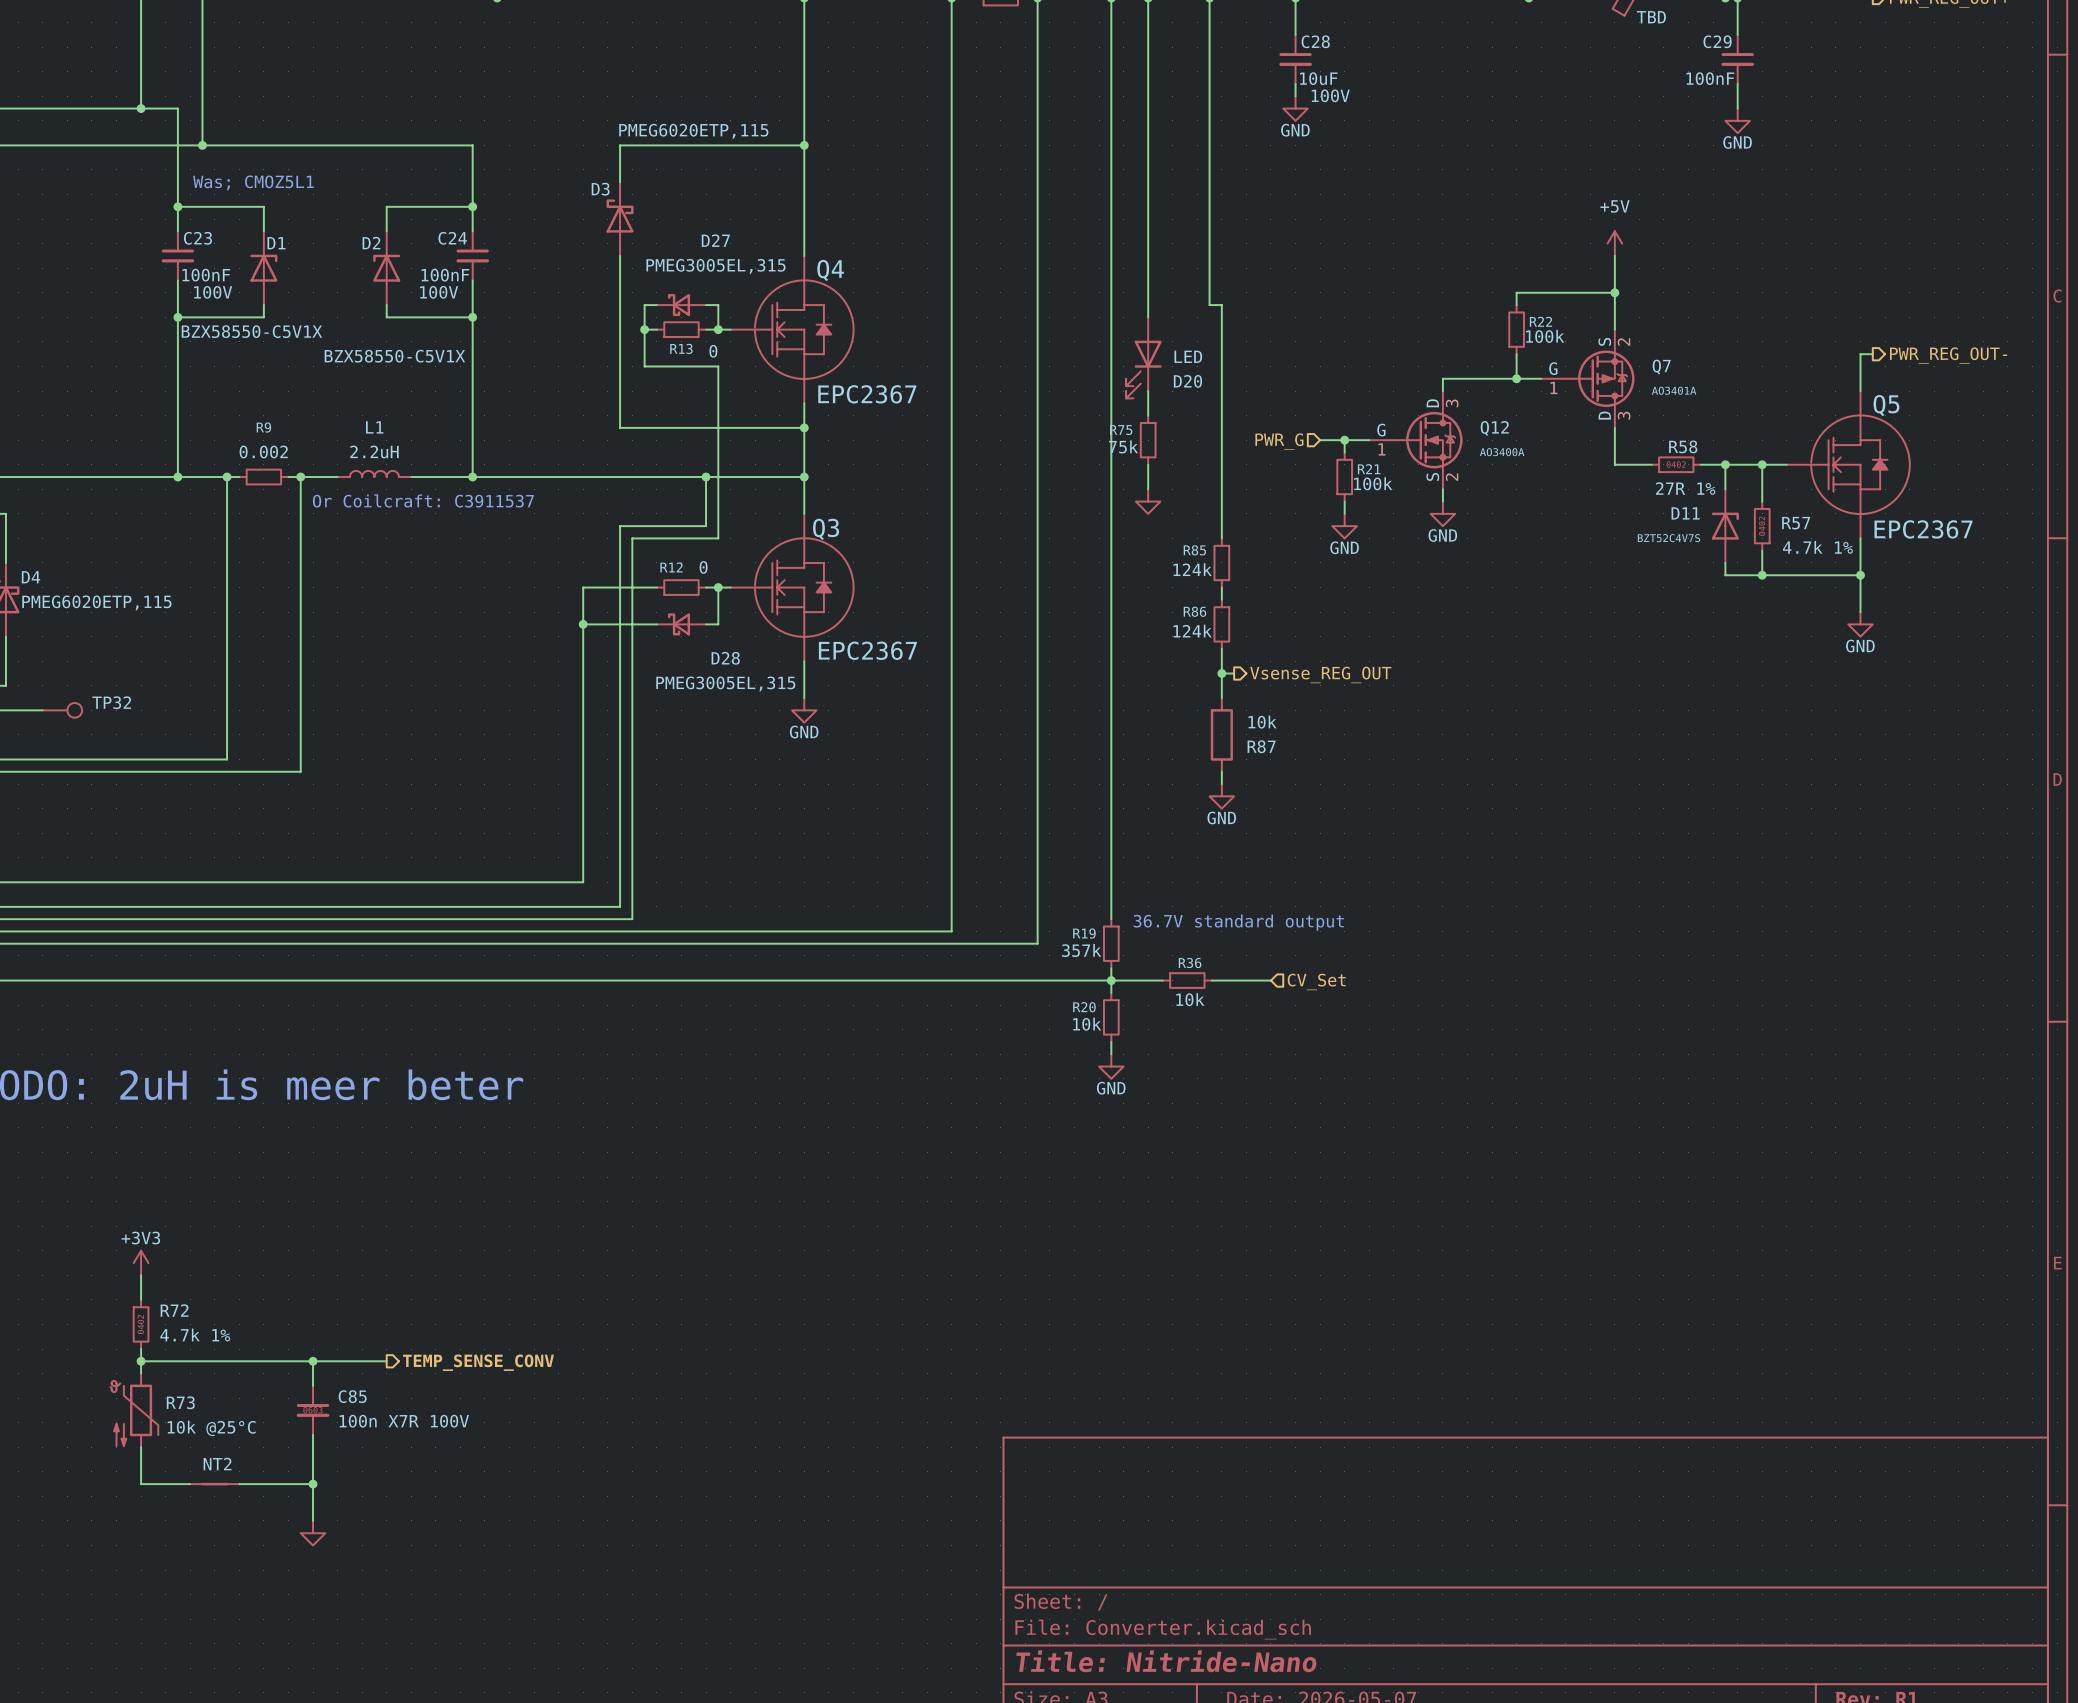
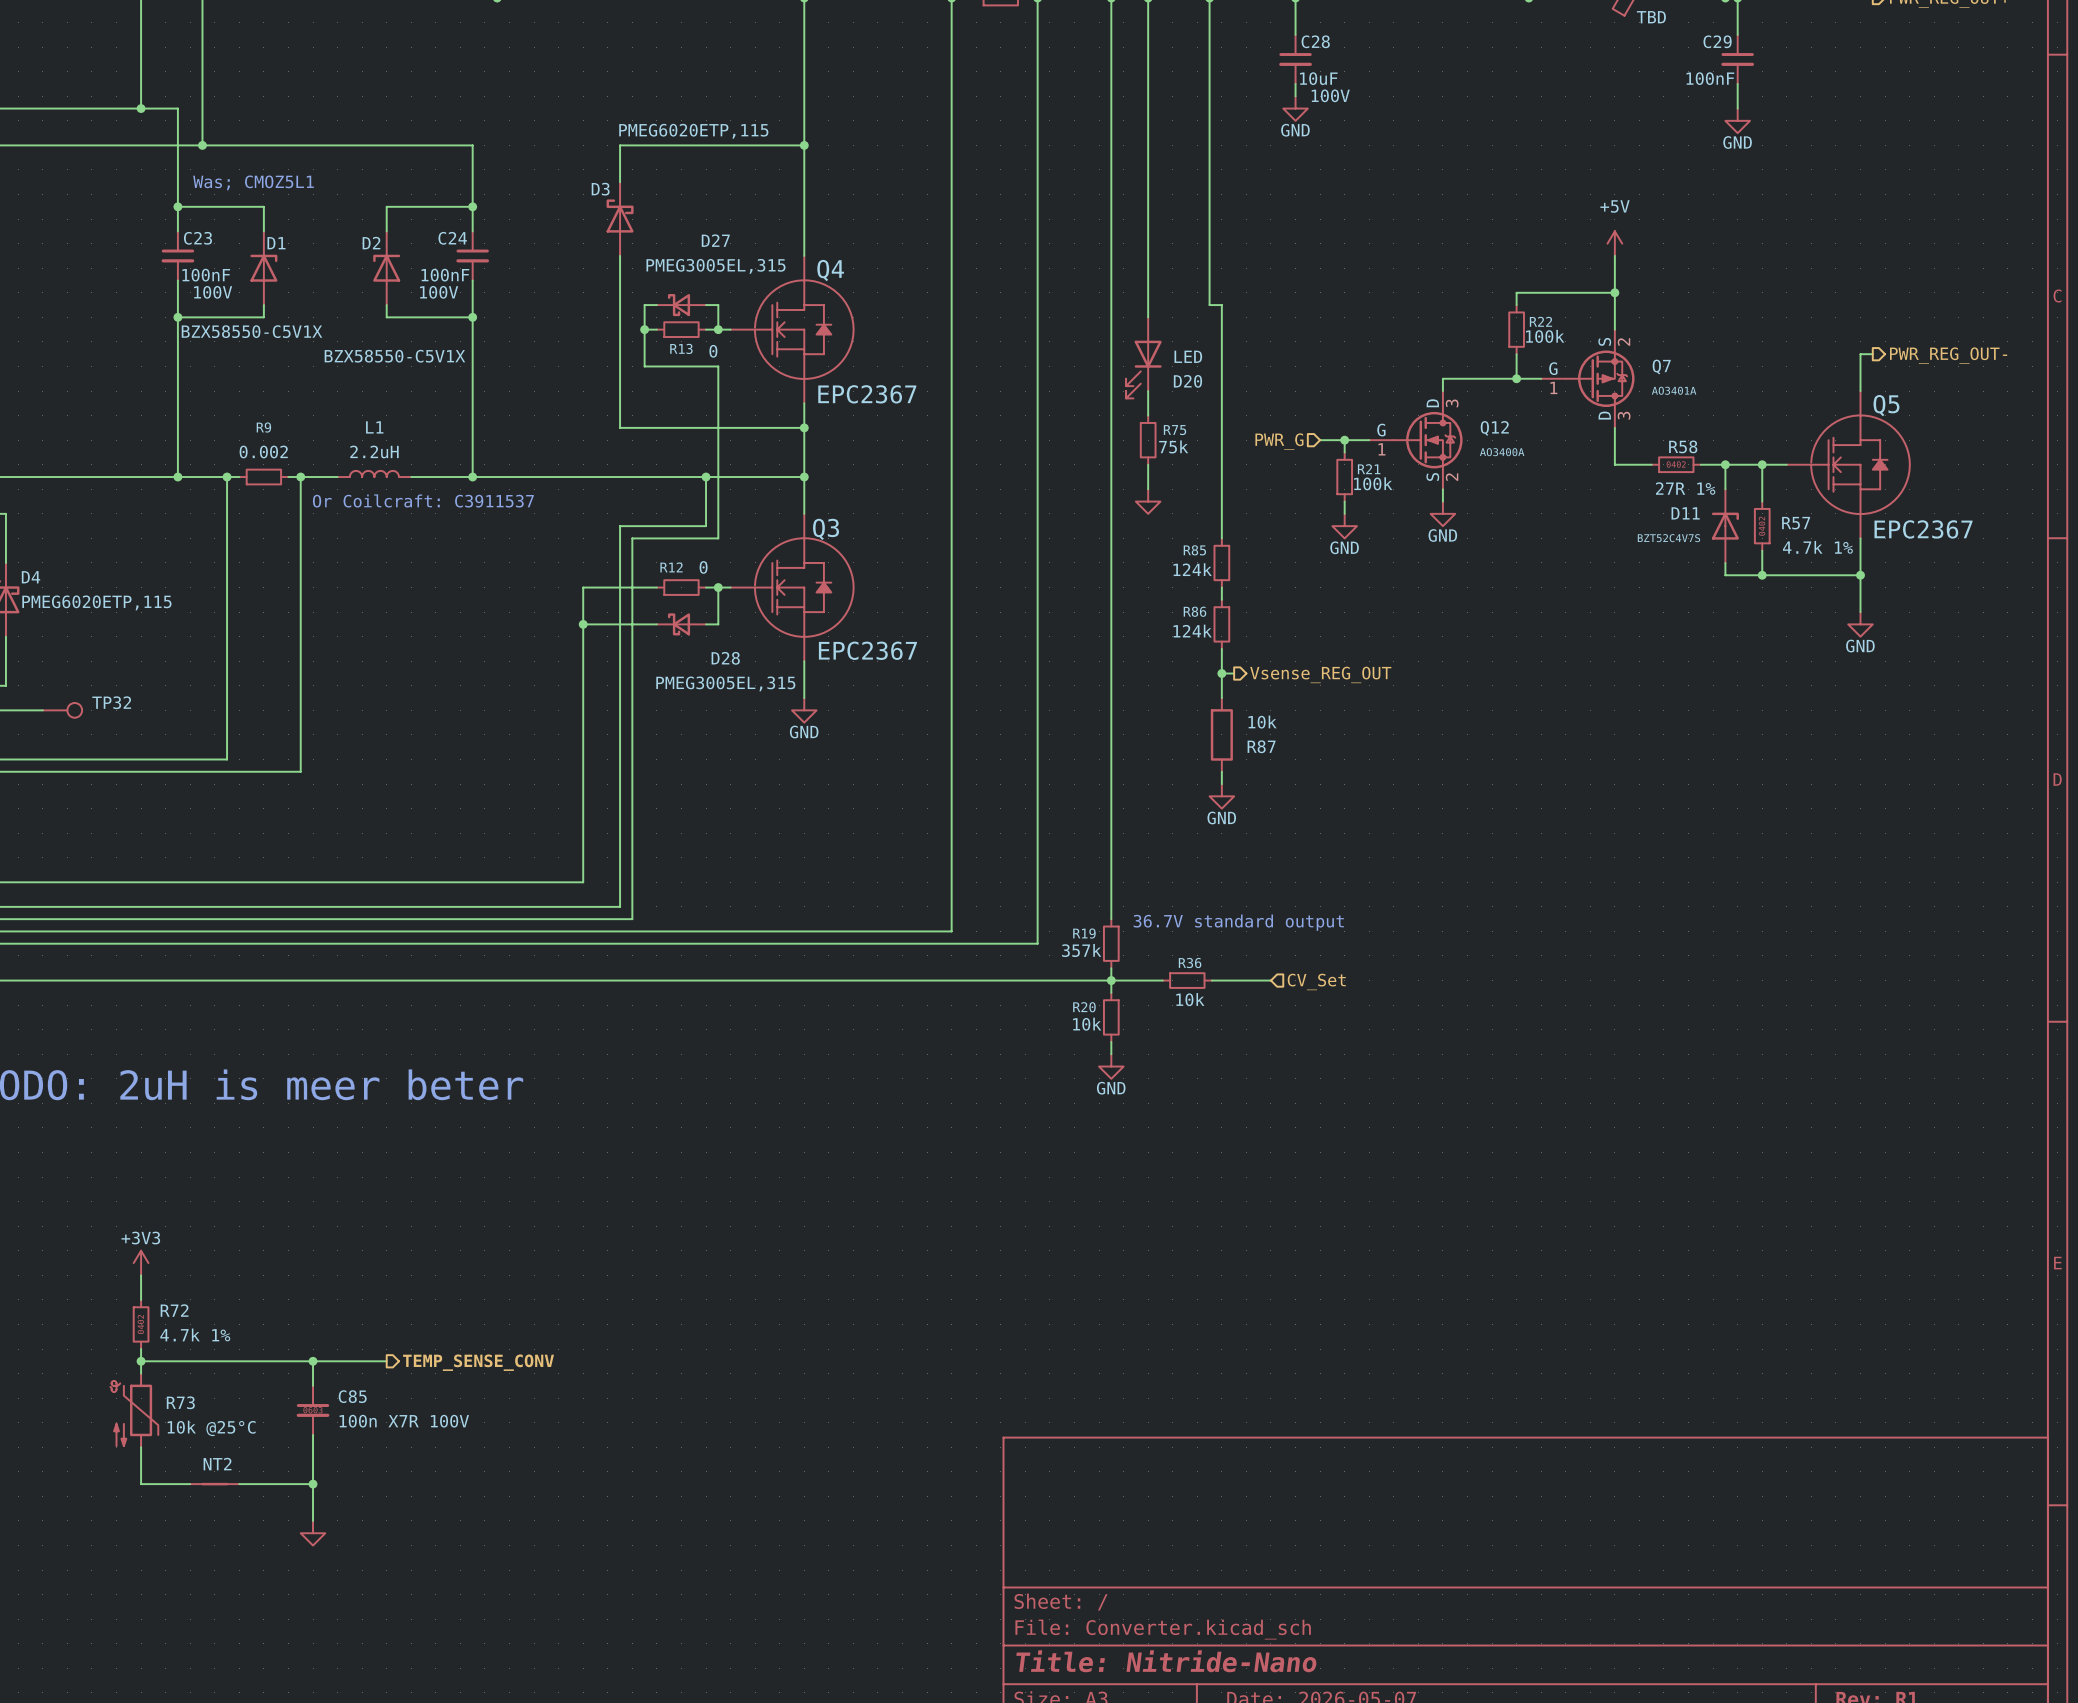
R75 name position: R75 (1121, 430) -> R75 (1175, 430)
R75 value position: 75k (1123, 446) -> 75k (1173, 446)

